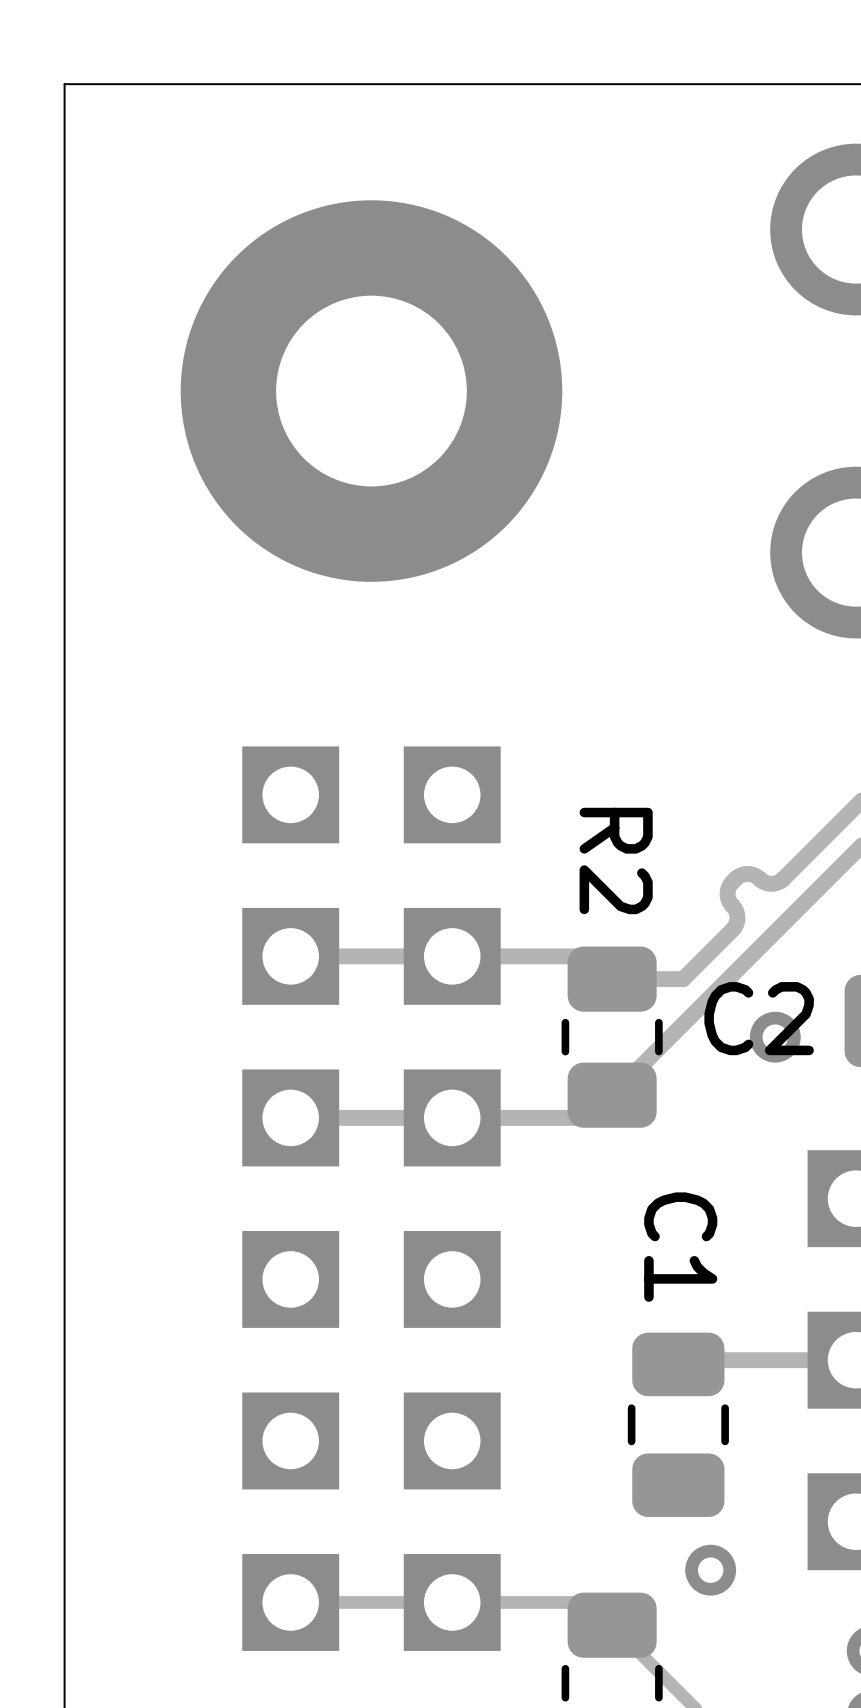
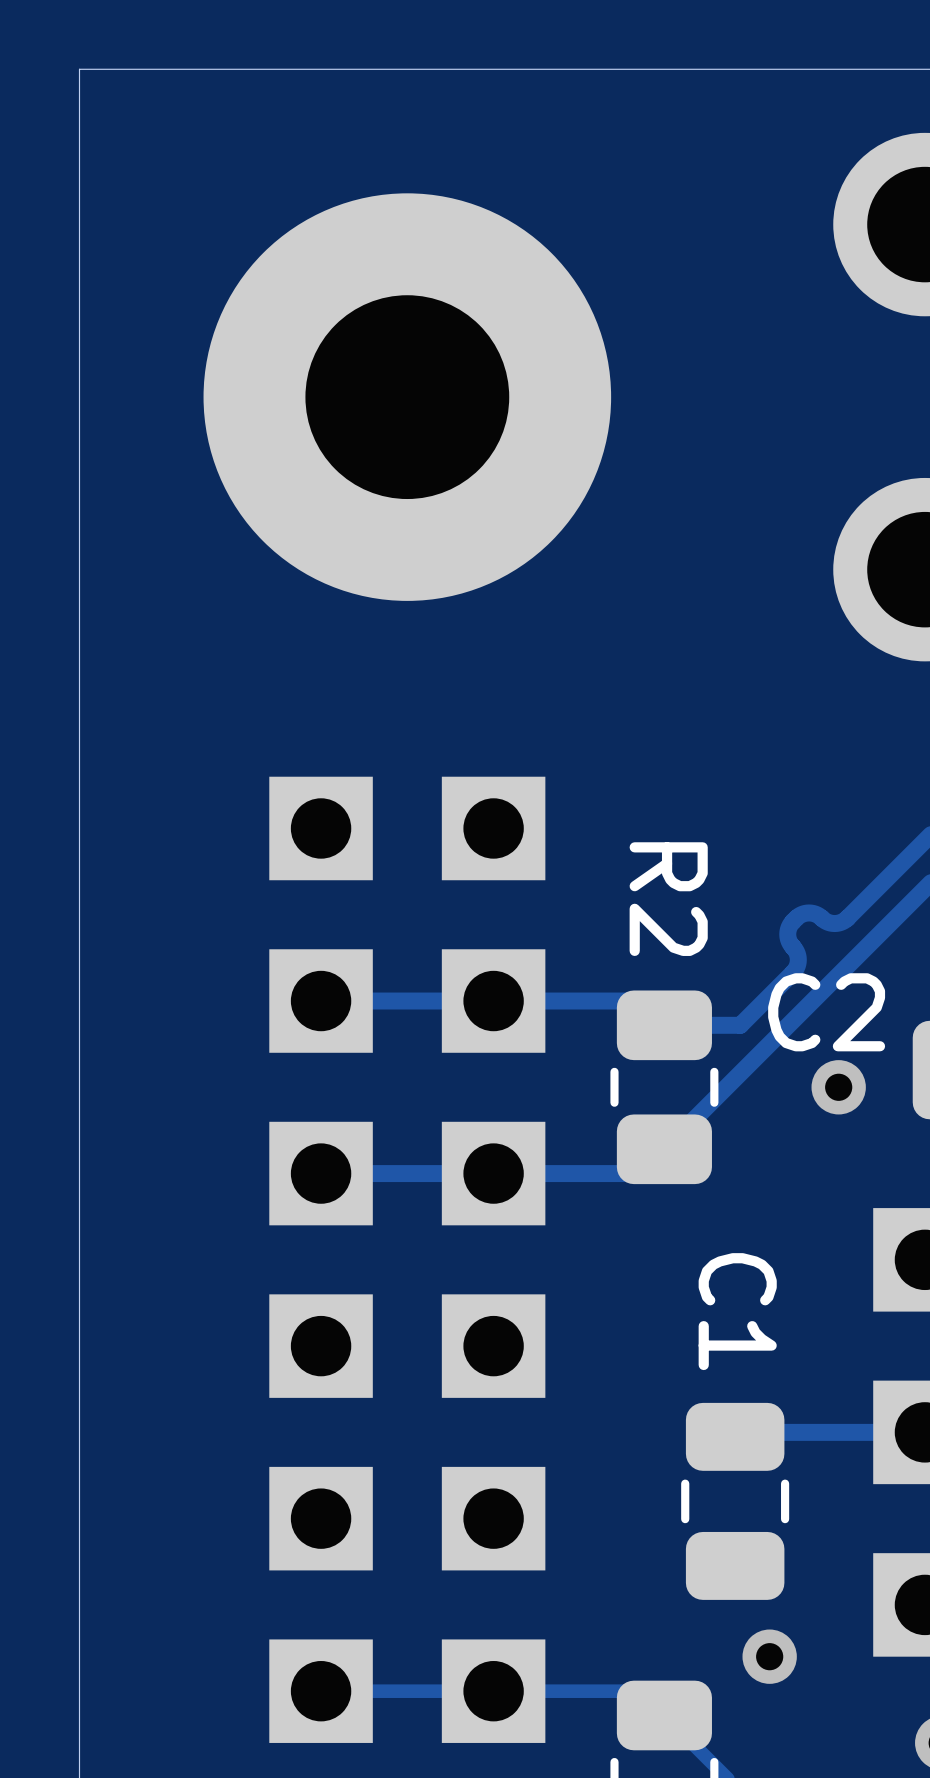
C2 name position: C2 (759, 1018) -> C2 (826, 1012)

